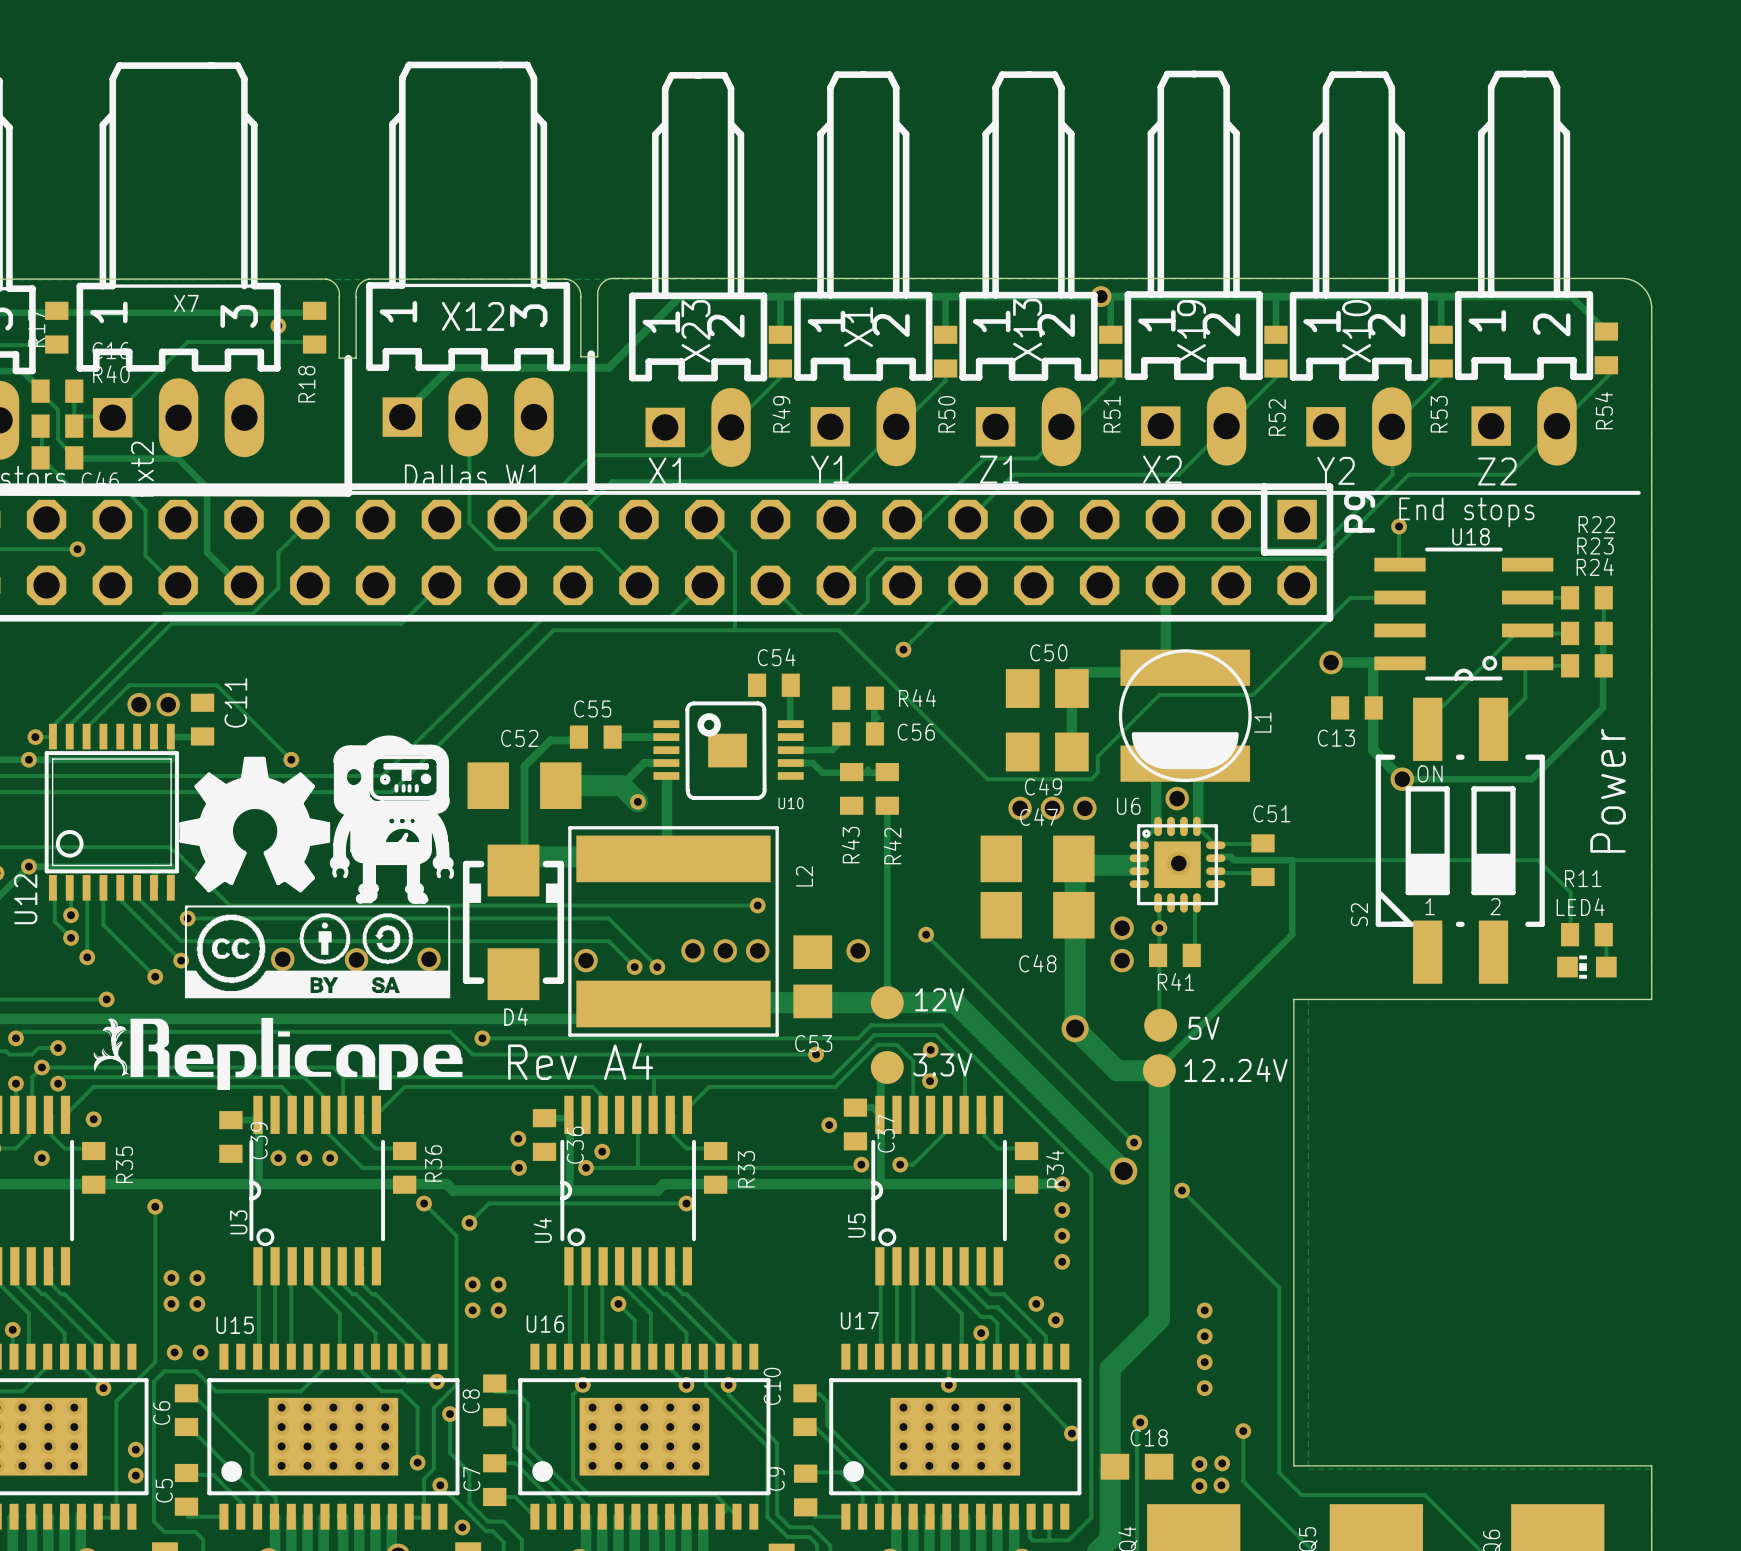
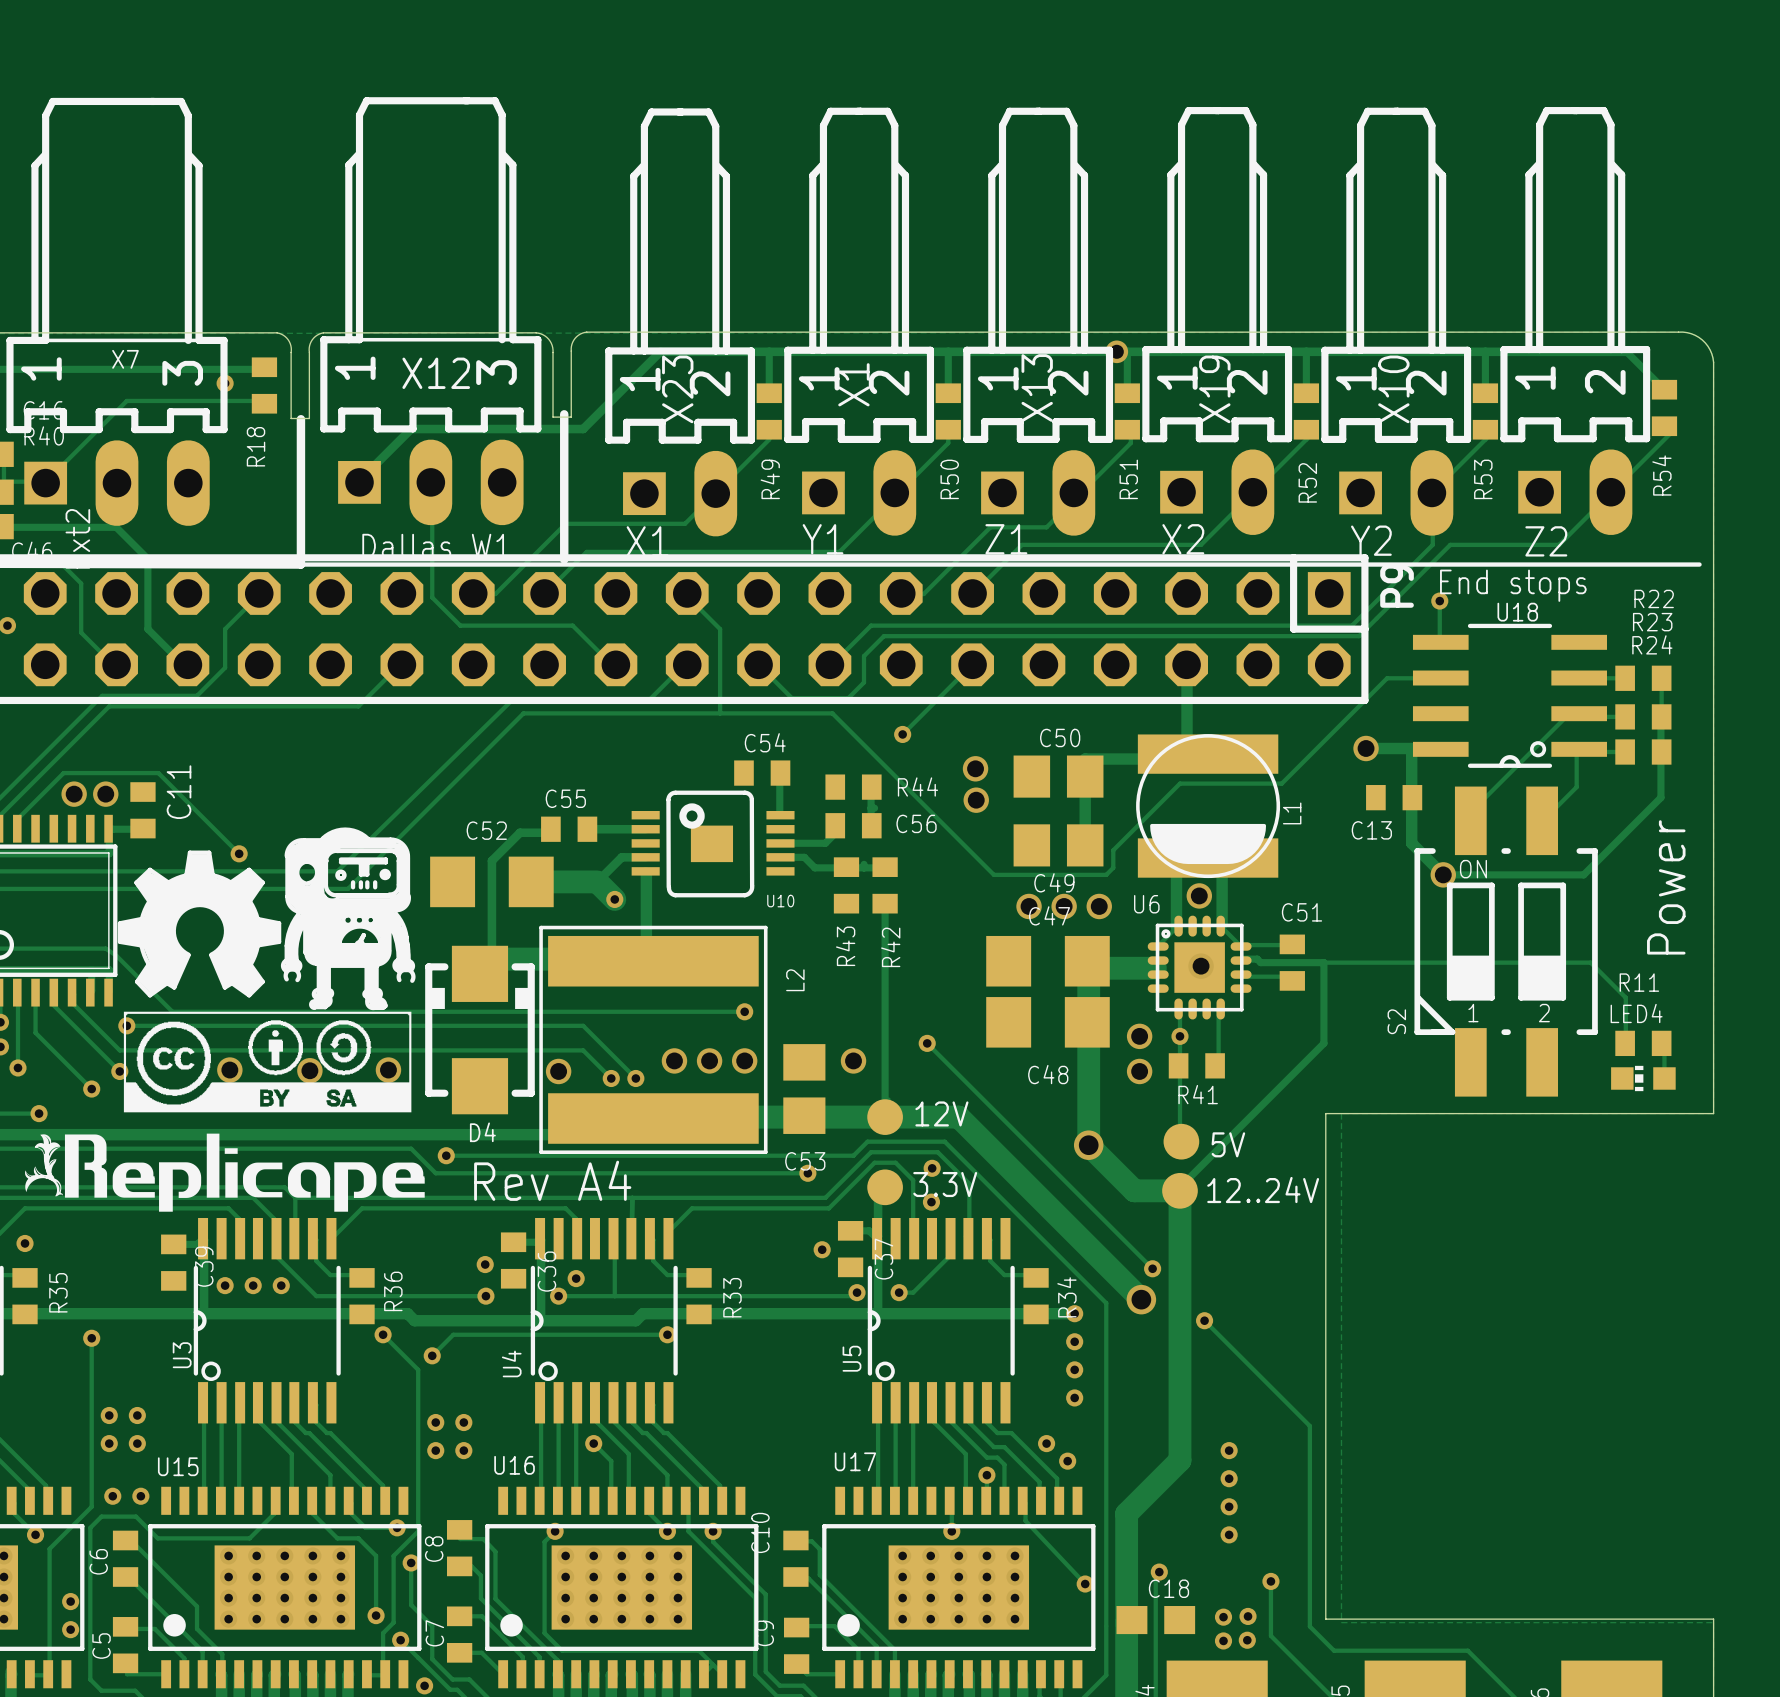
via: none -> (975, 768)
via: none -> (976, 800)

